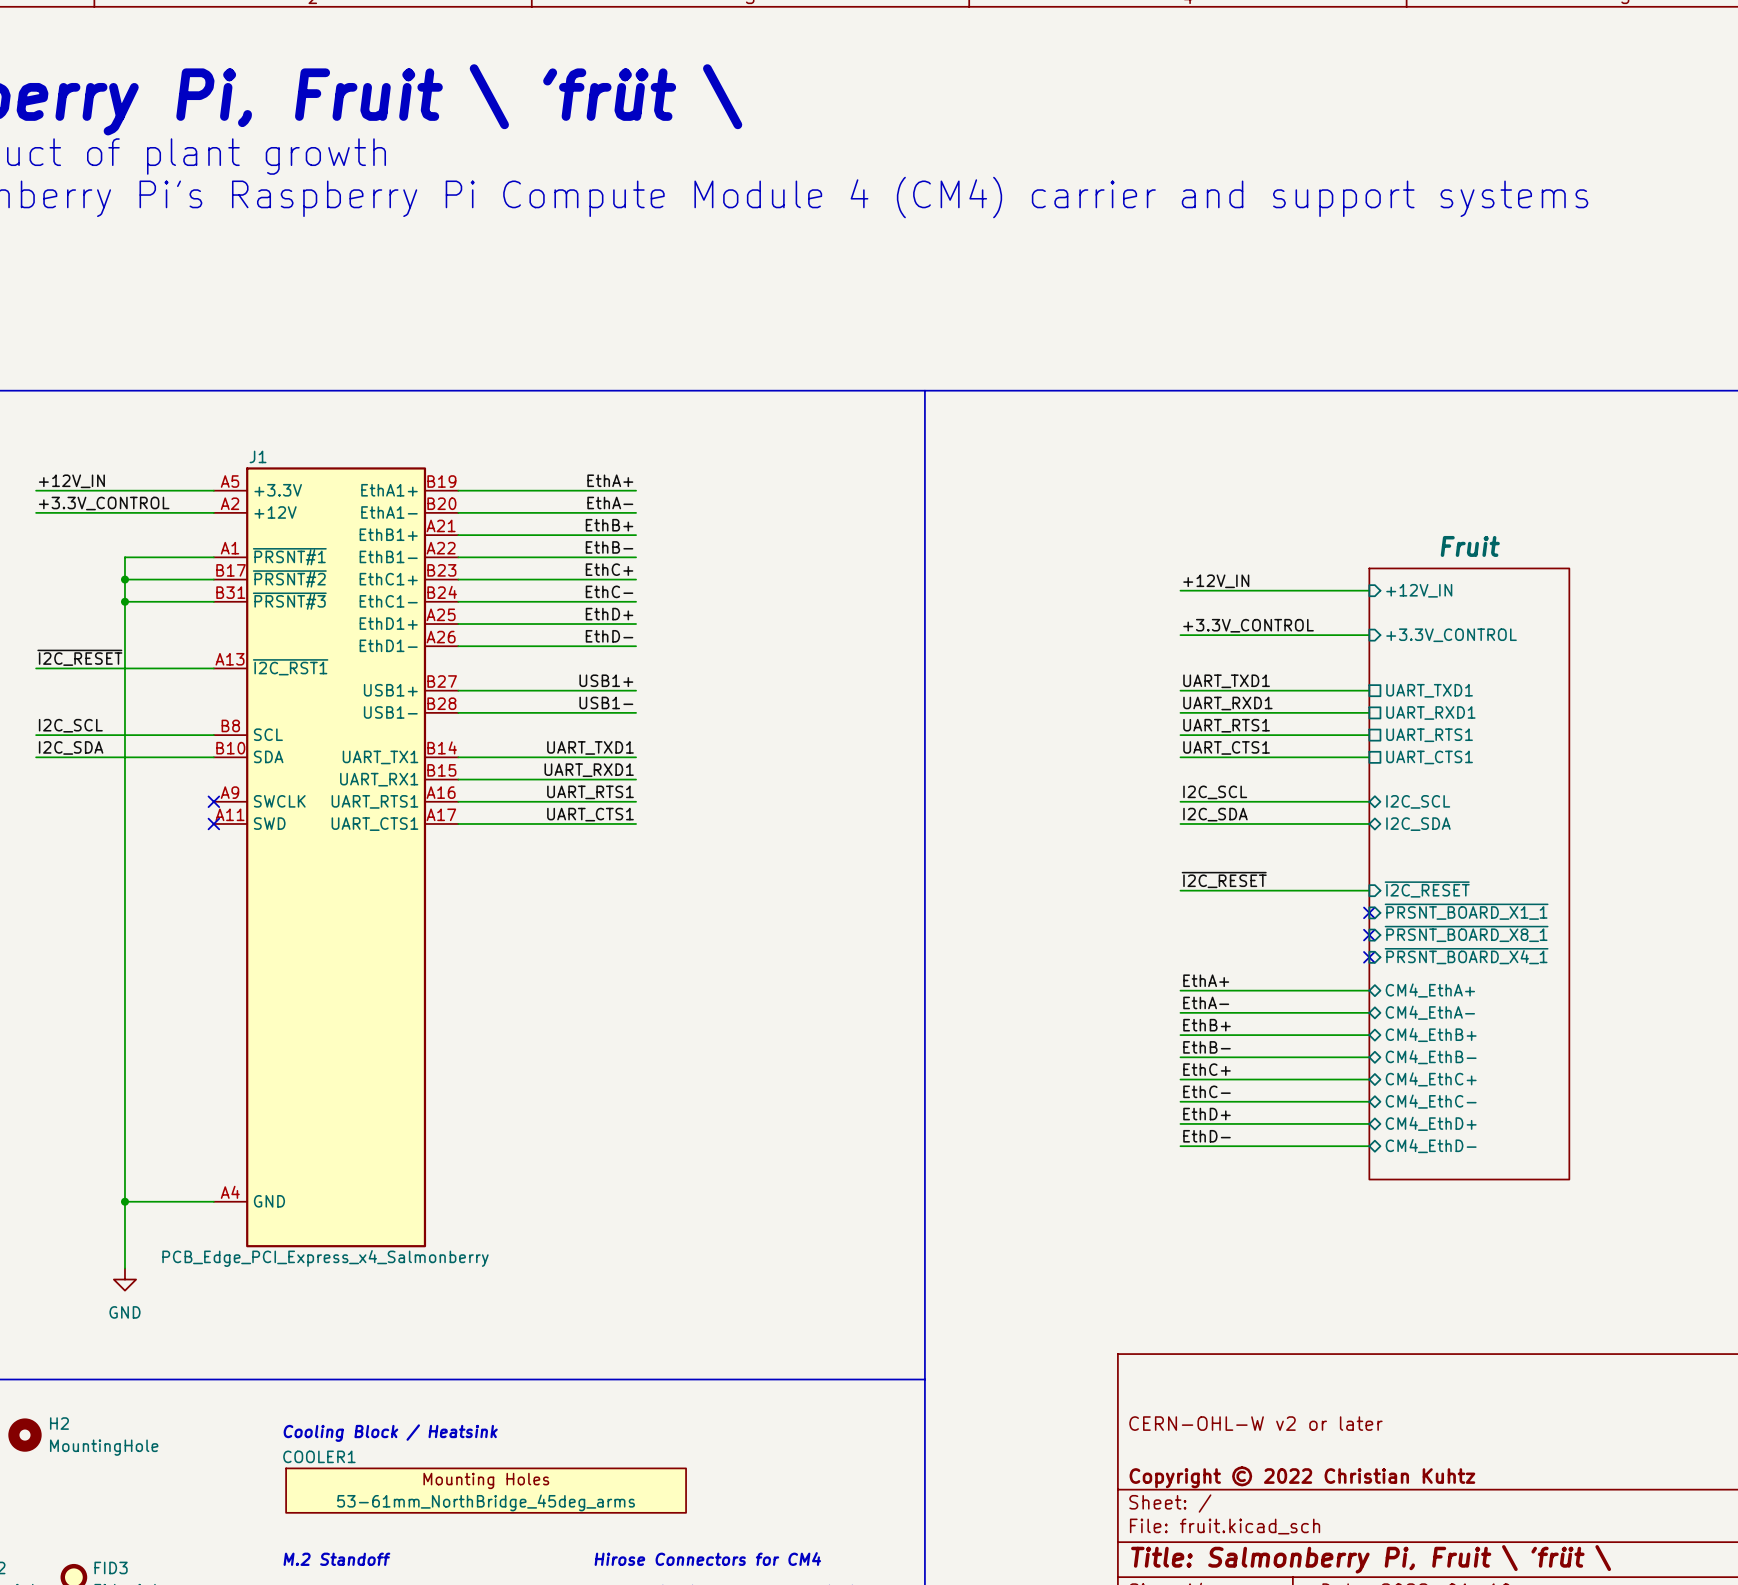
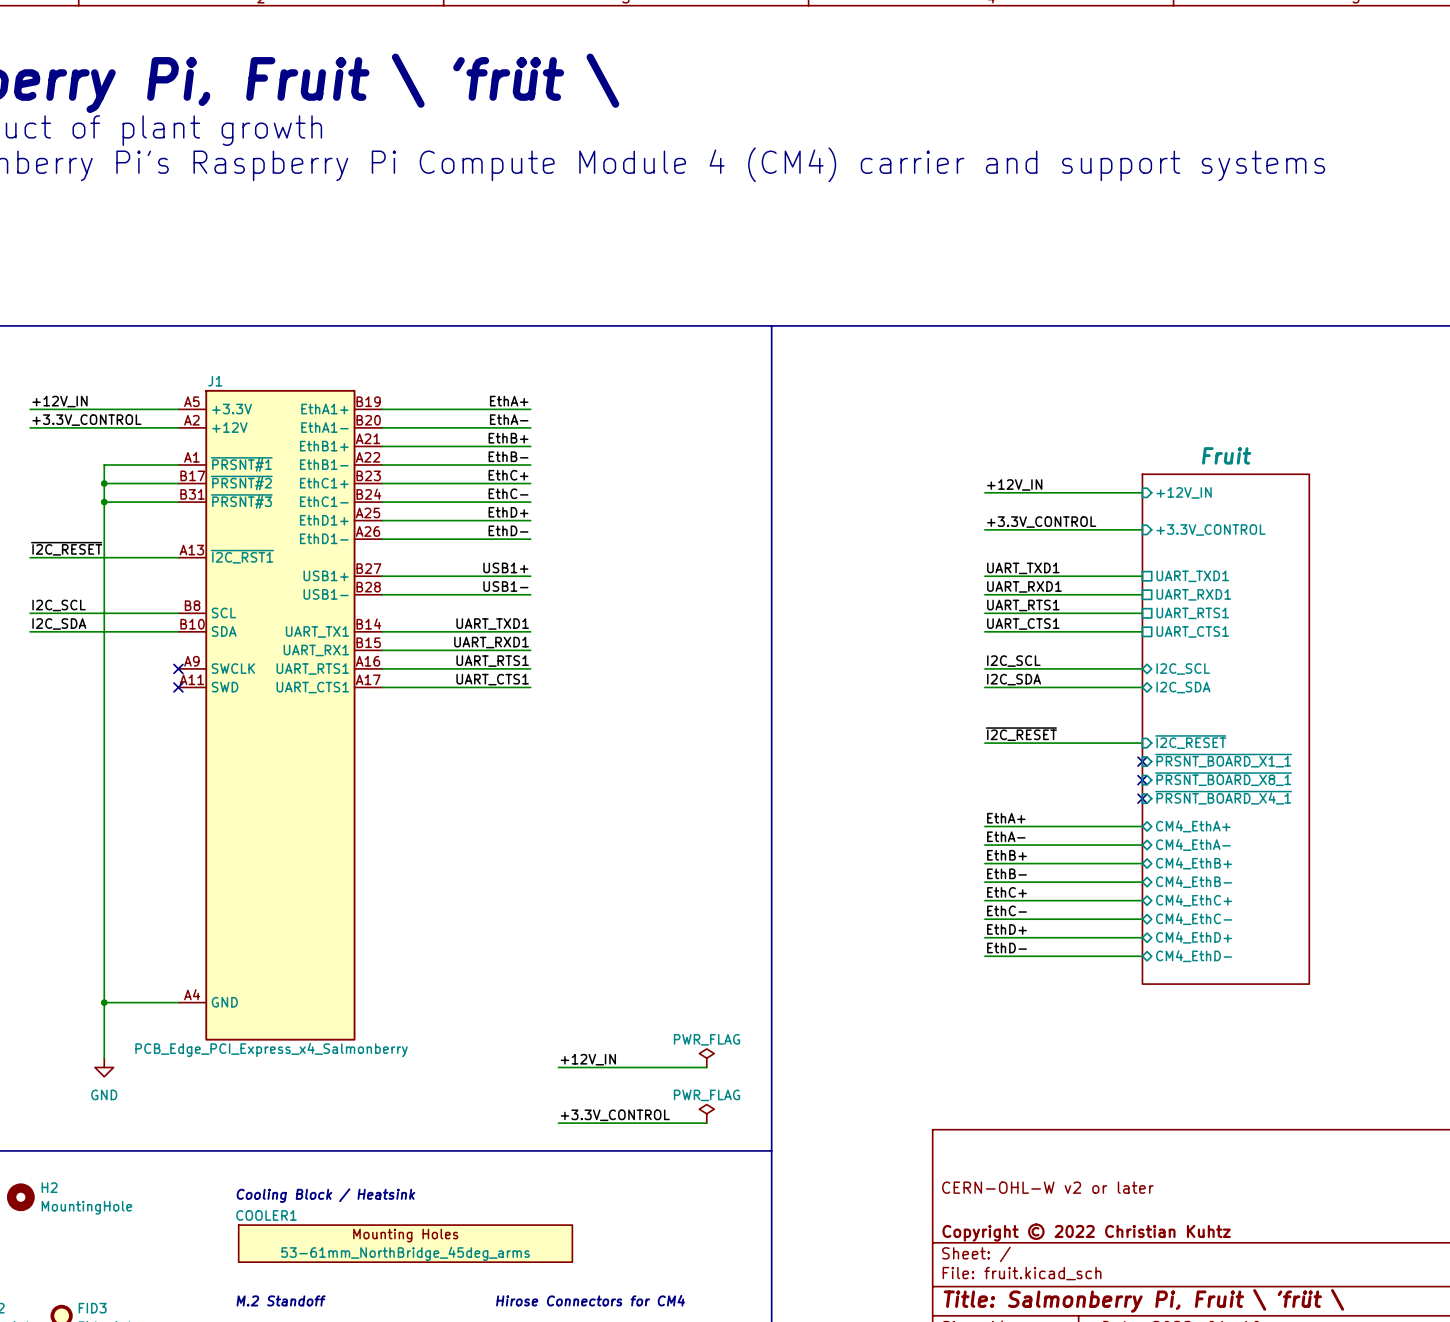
power symbol: none -> PWR_FLAG (706, 1058)
label: none -> +12V_IN (588, 1059)
wire: none -> (558, 1067) (706, 1067)
power symbol: none -> PWR_FLAG (706, 1113)
label: none -> +3.3V_CONTROL (615, 1115)
wire: none -> (558, 1123) (706, 1123)

